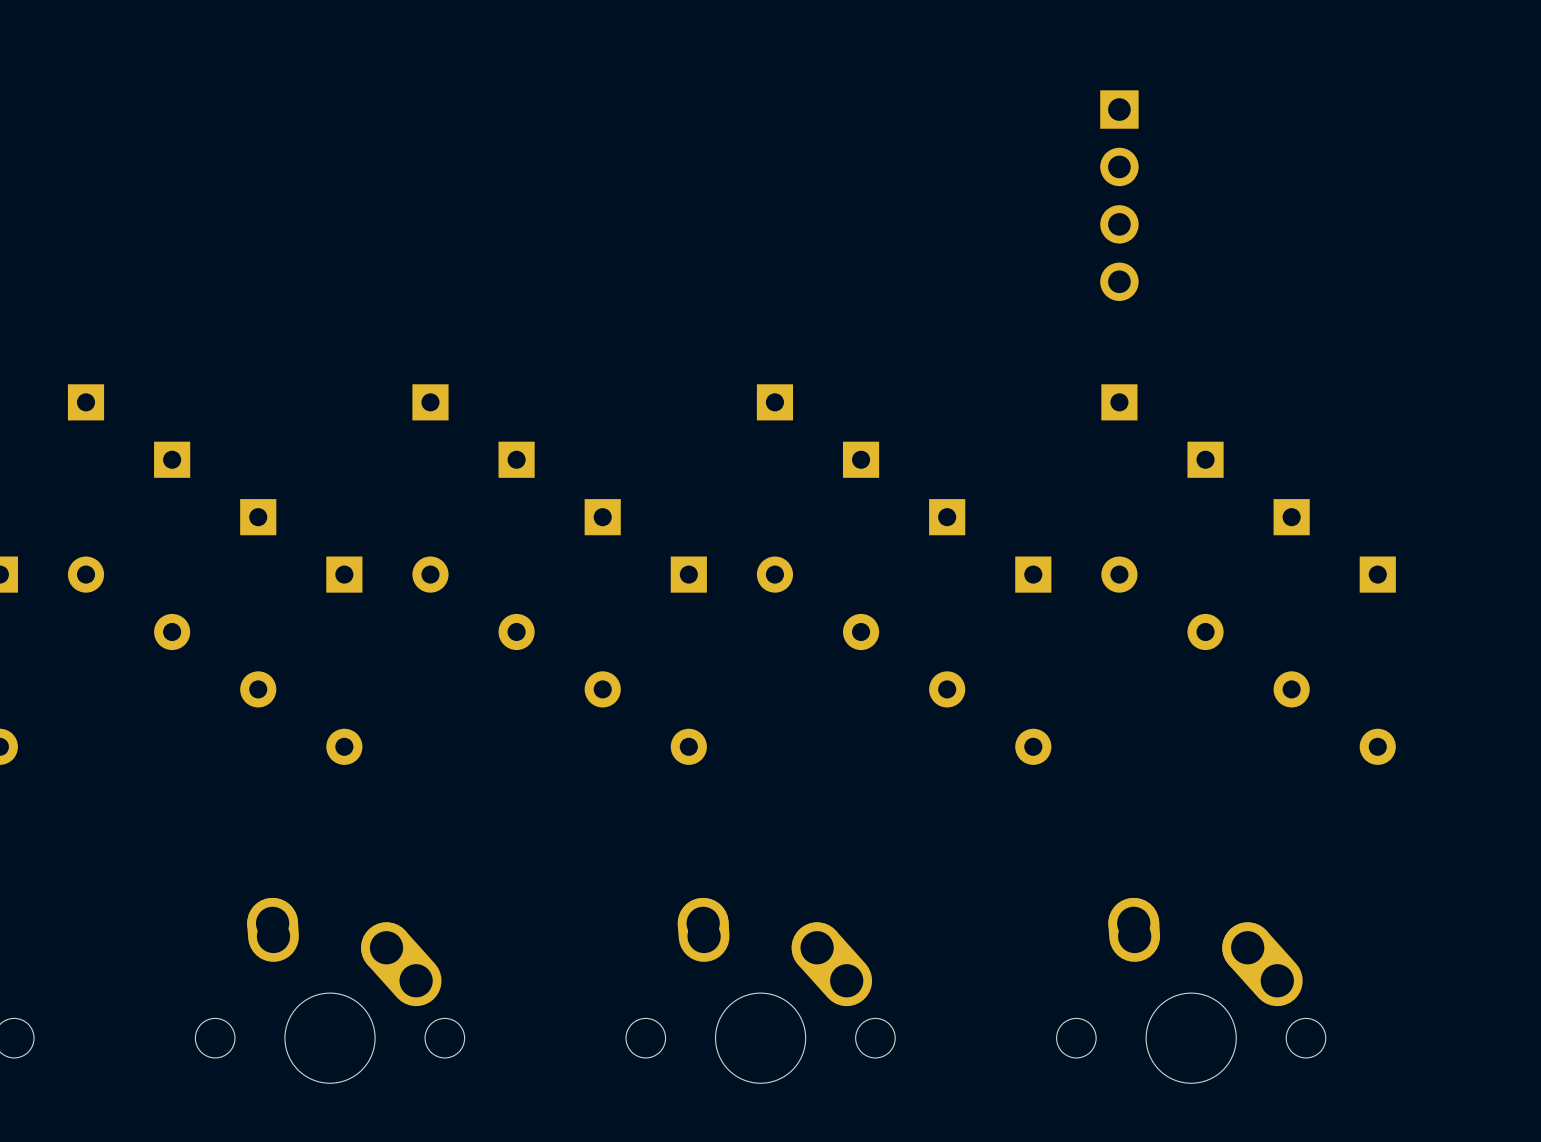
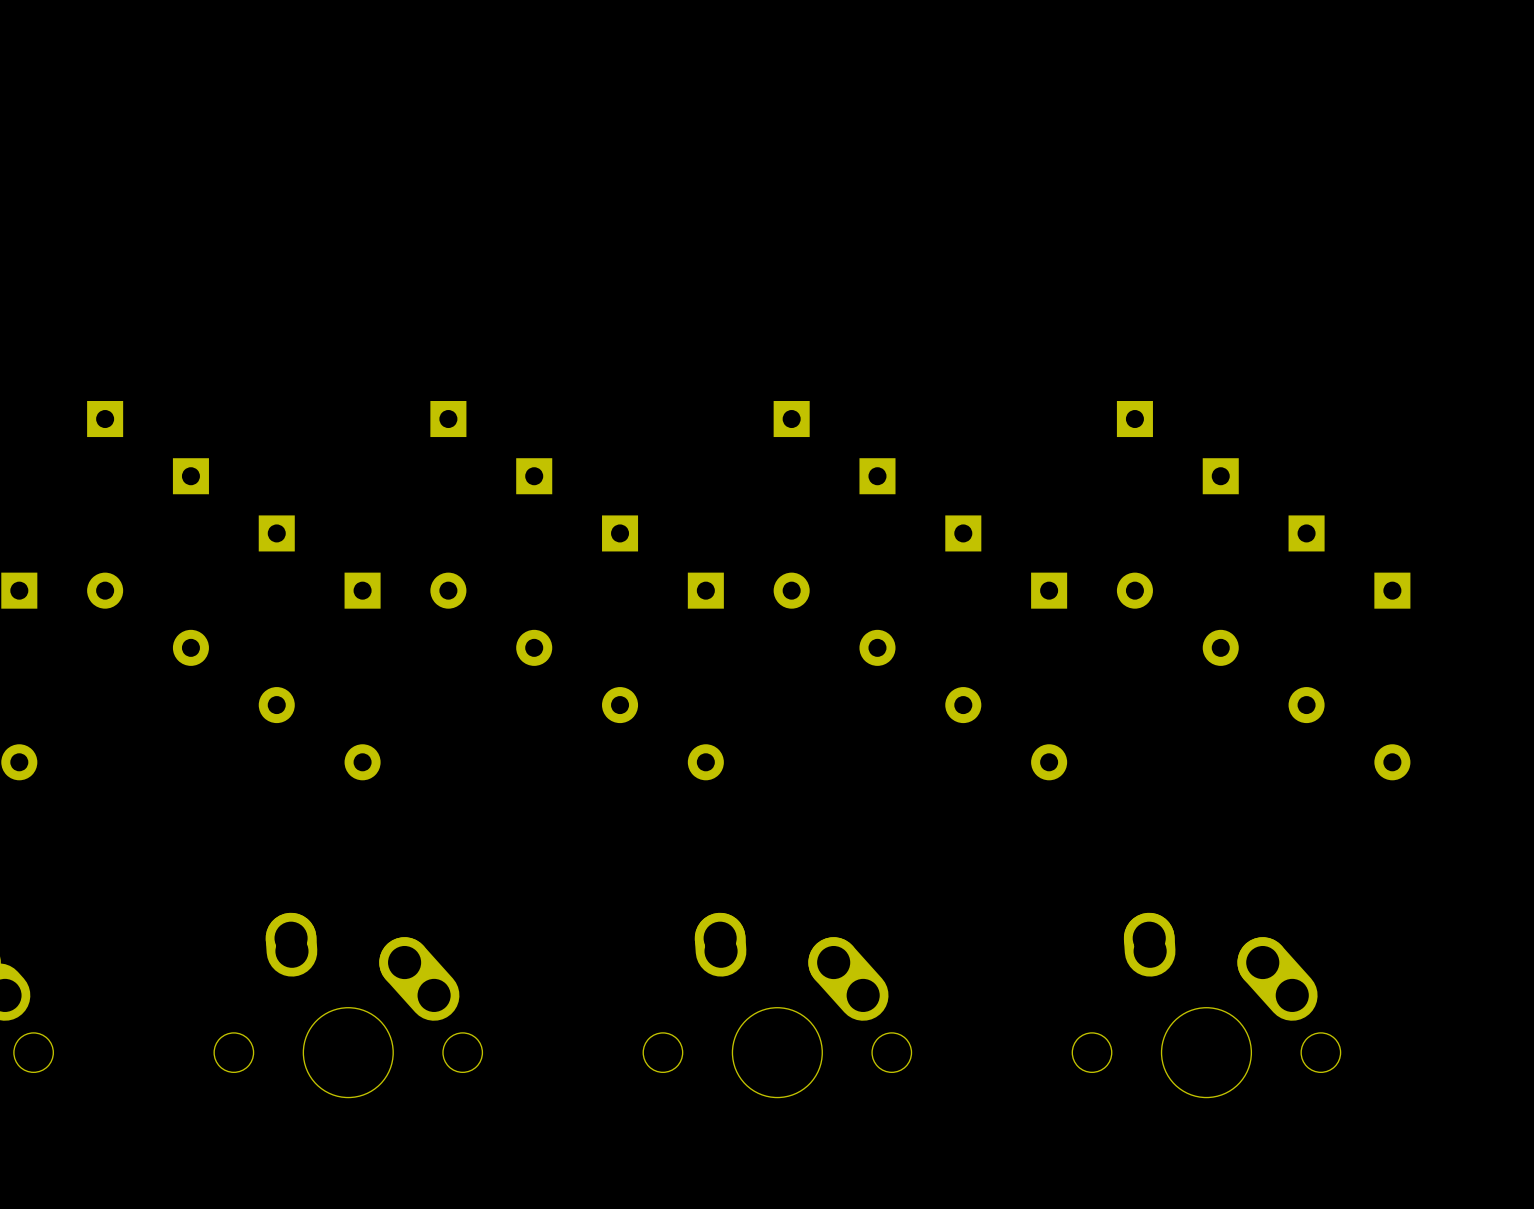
part: (1119, 195) -> none

